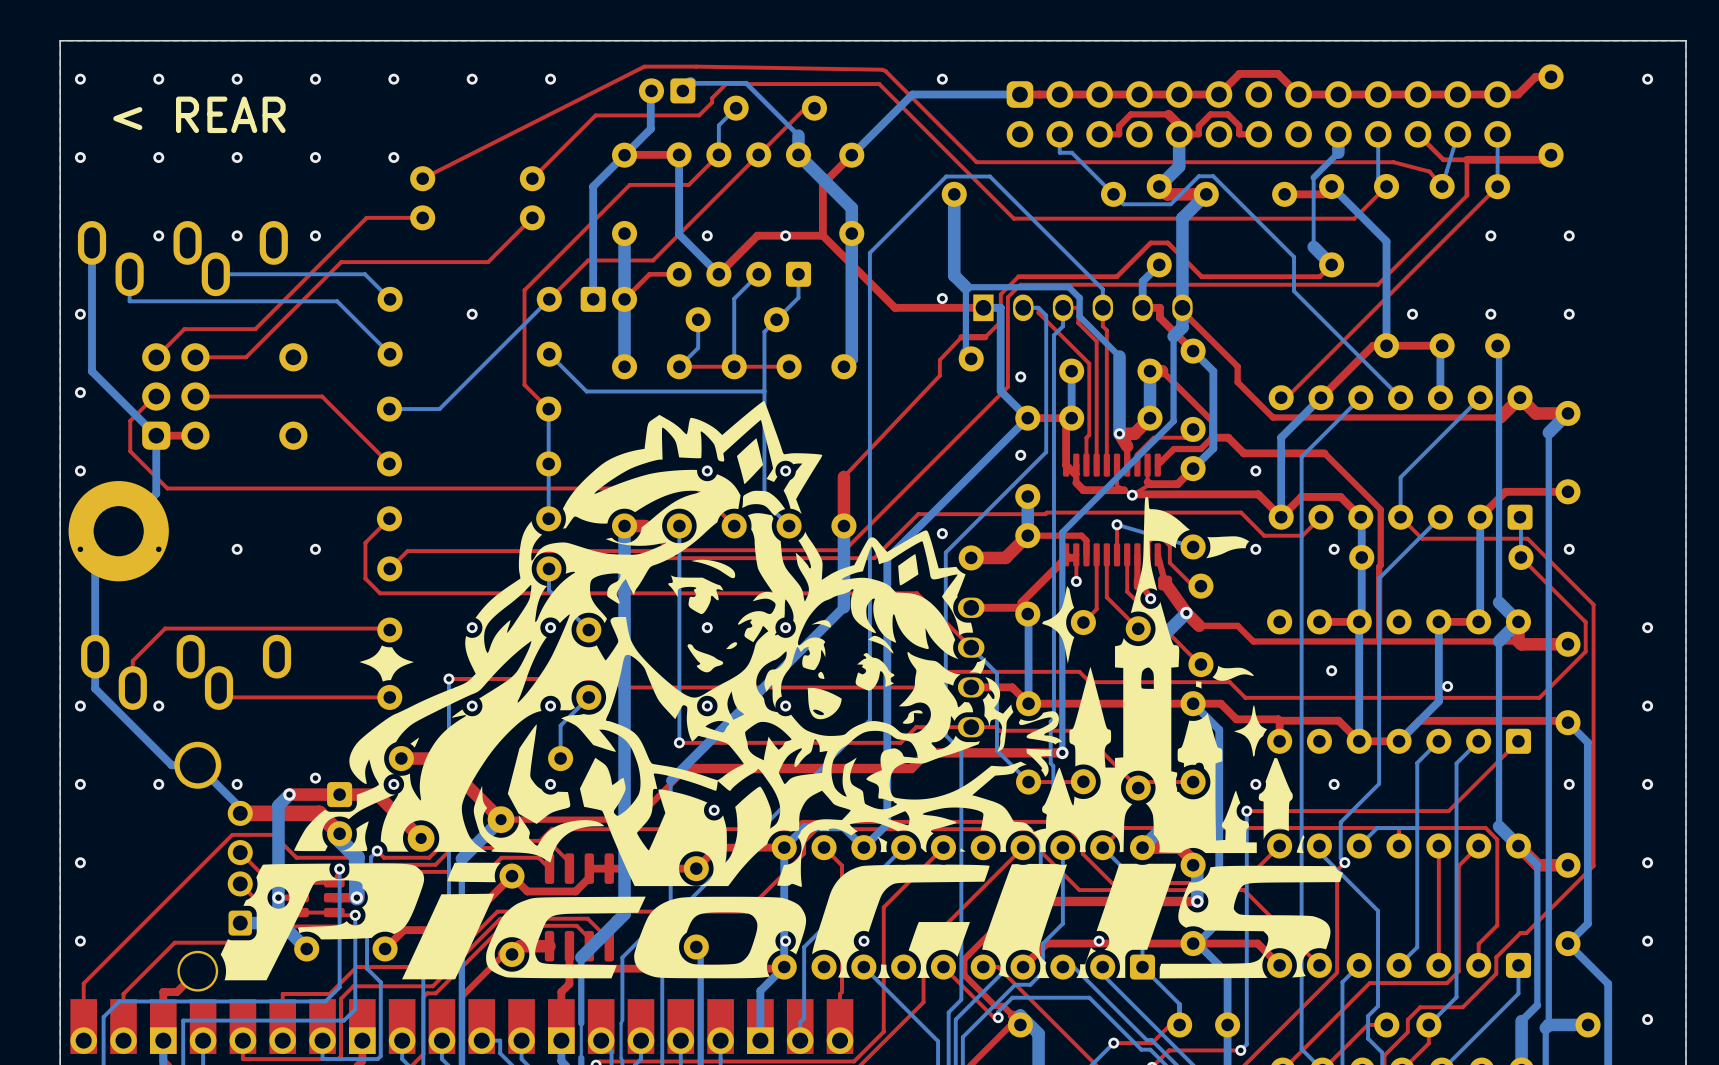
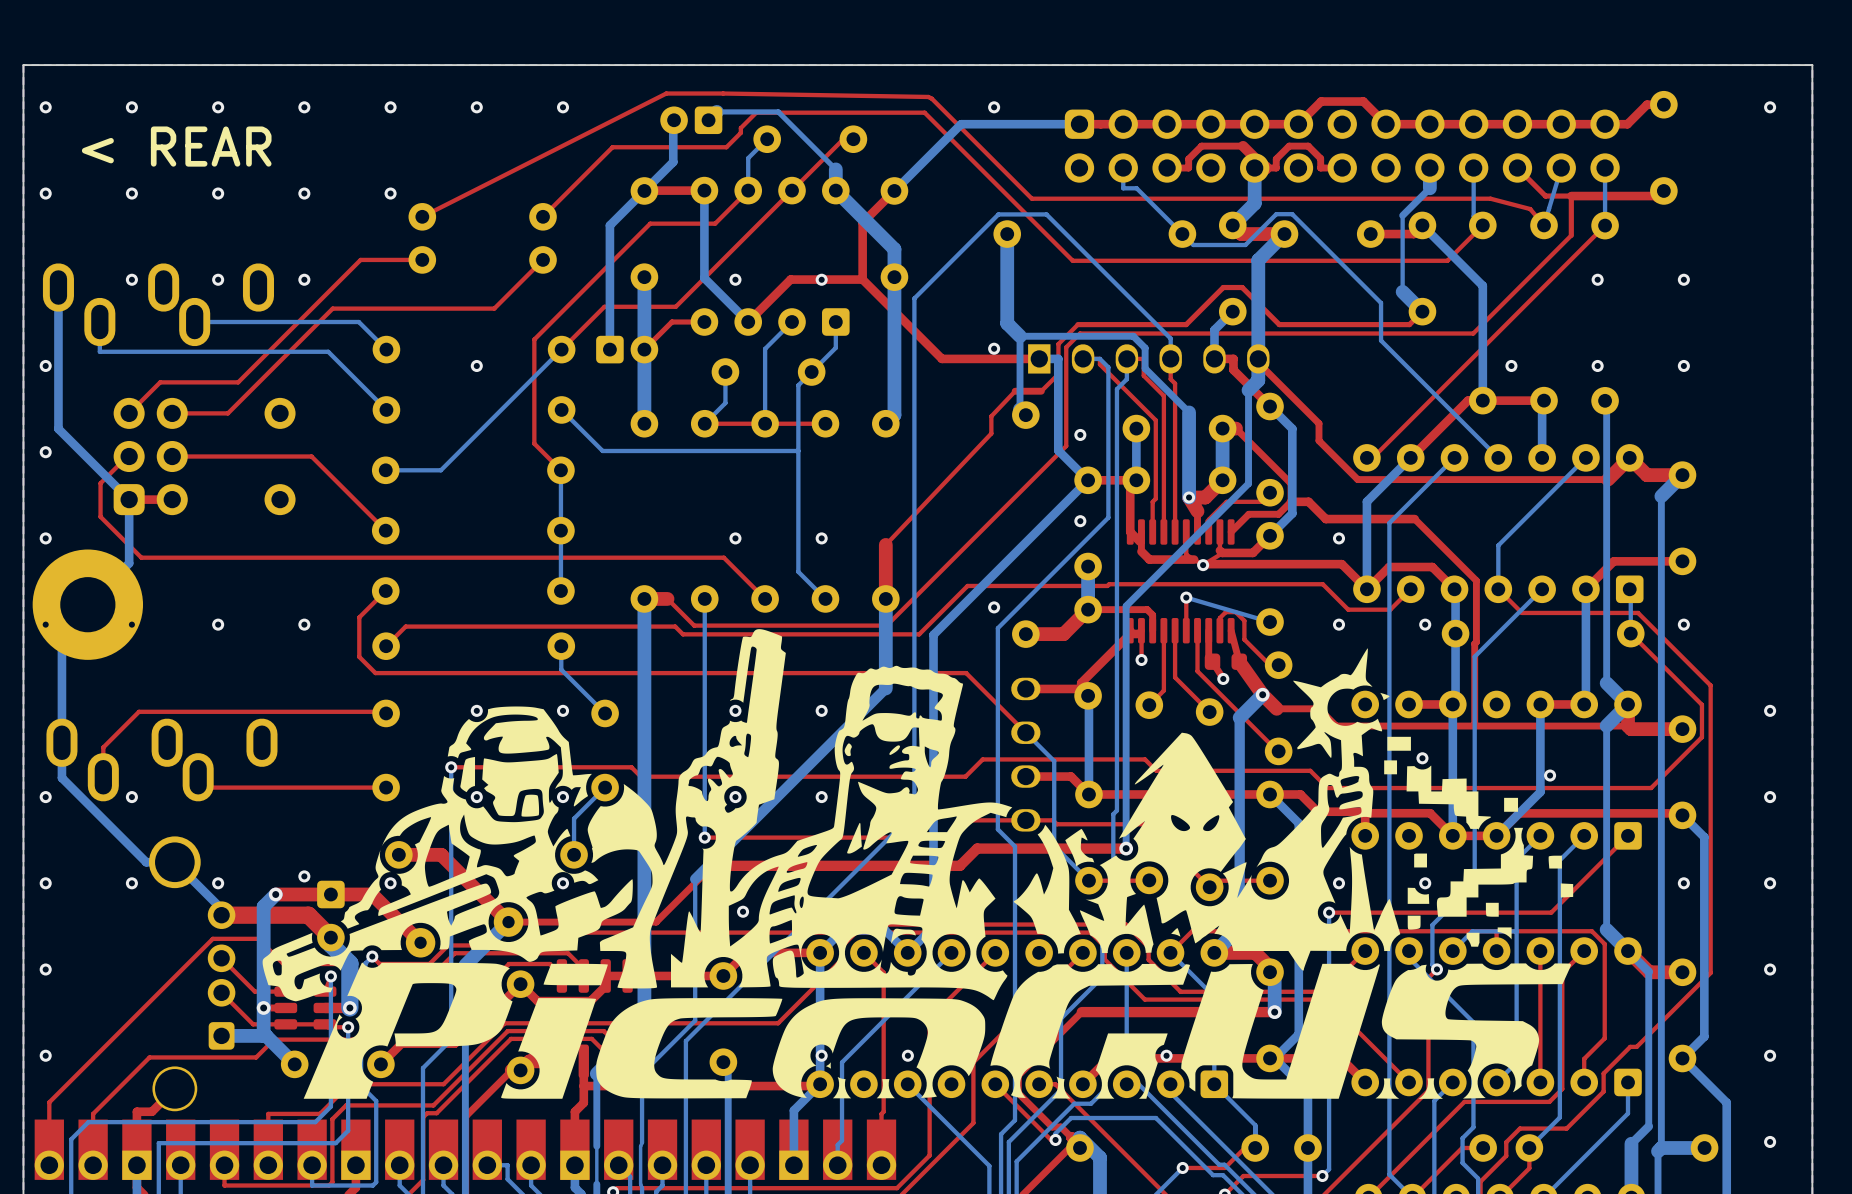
drawing: [220, 400, 1343, 981] -> none
drawing: none -> [262, 629, 1574, 1099]
drawing shape: [982, 863, 1068, 979] -> [990, 963, 1190, 1098]
drawing: none -> [1051, 1076, 1071, 1099]

